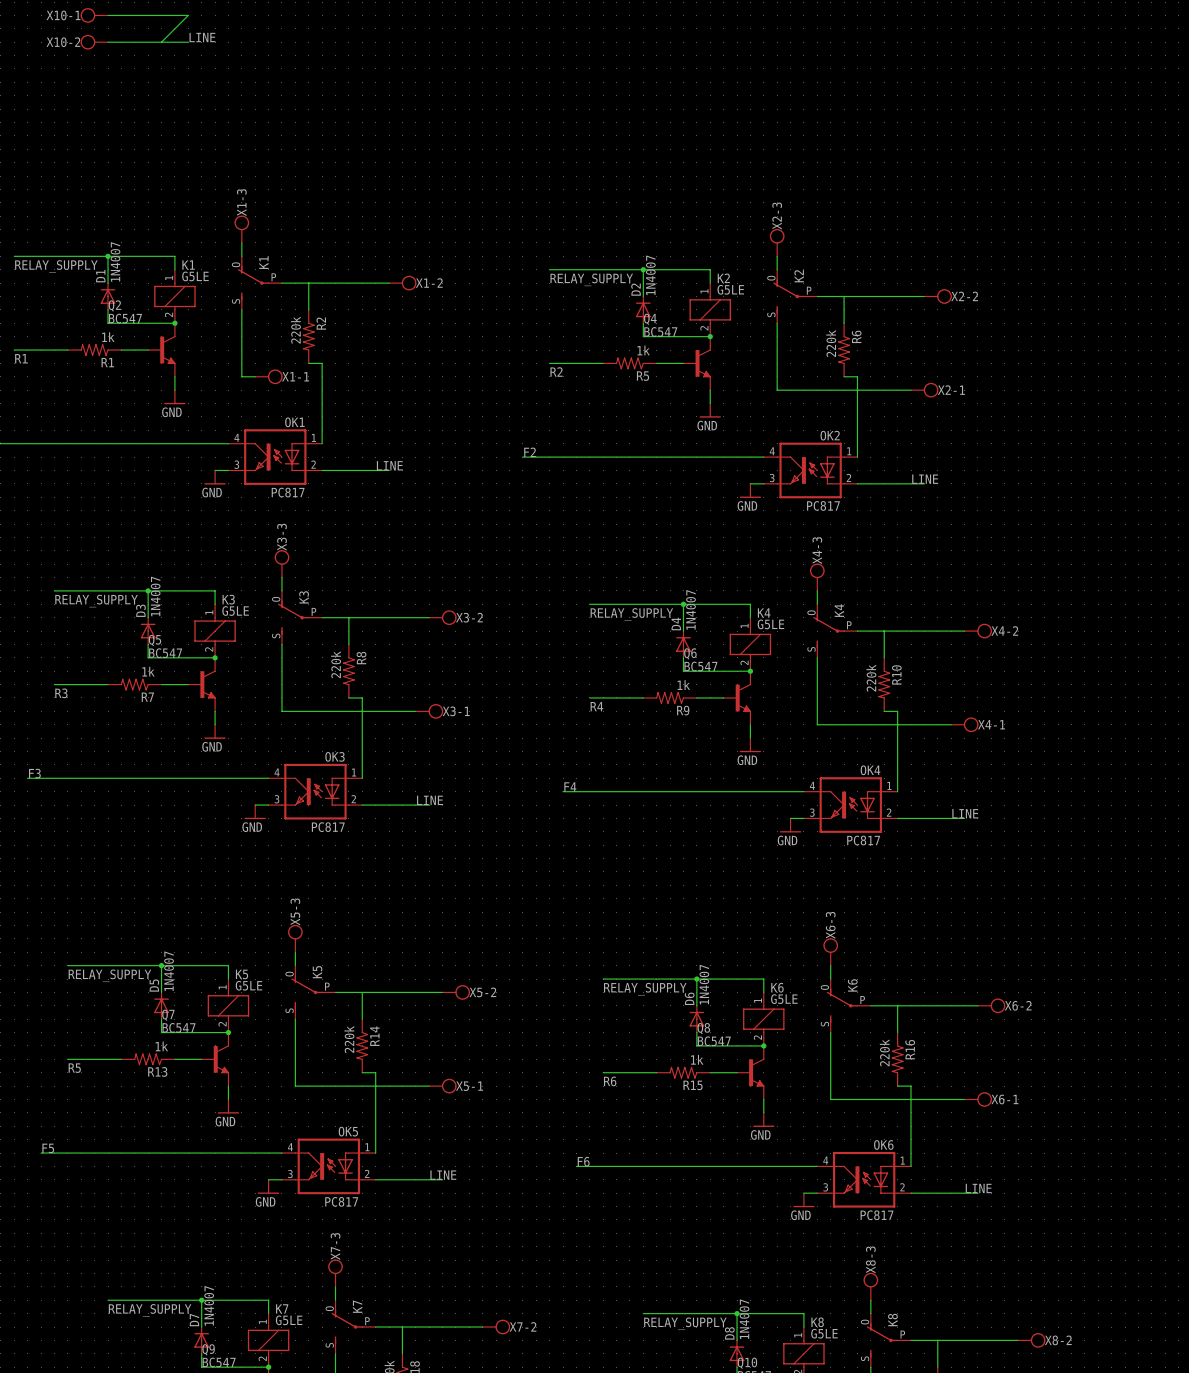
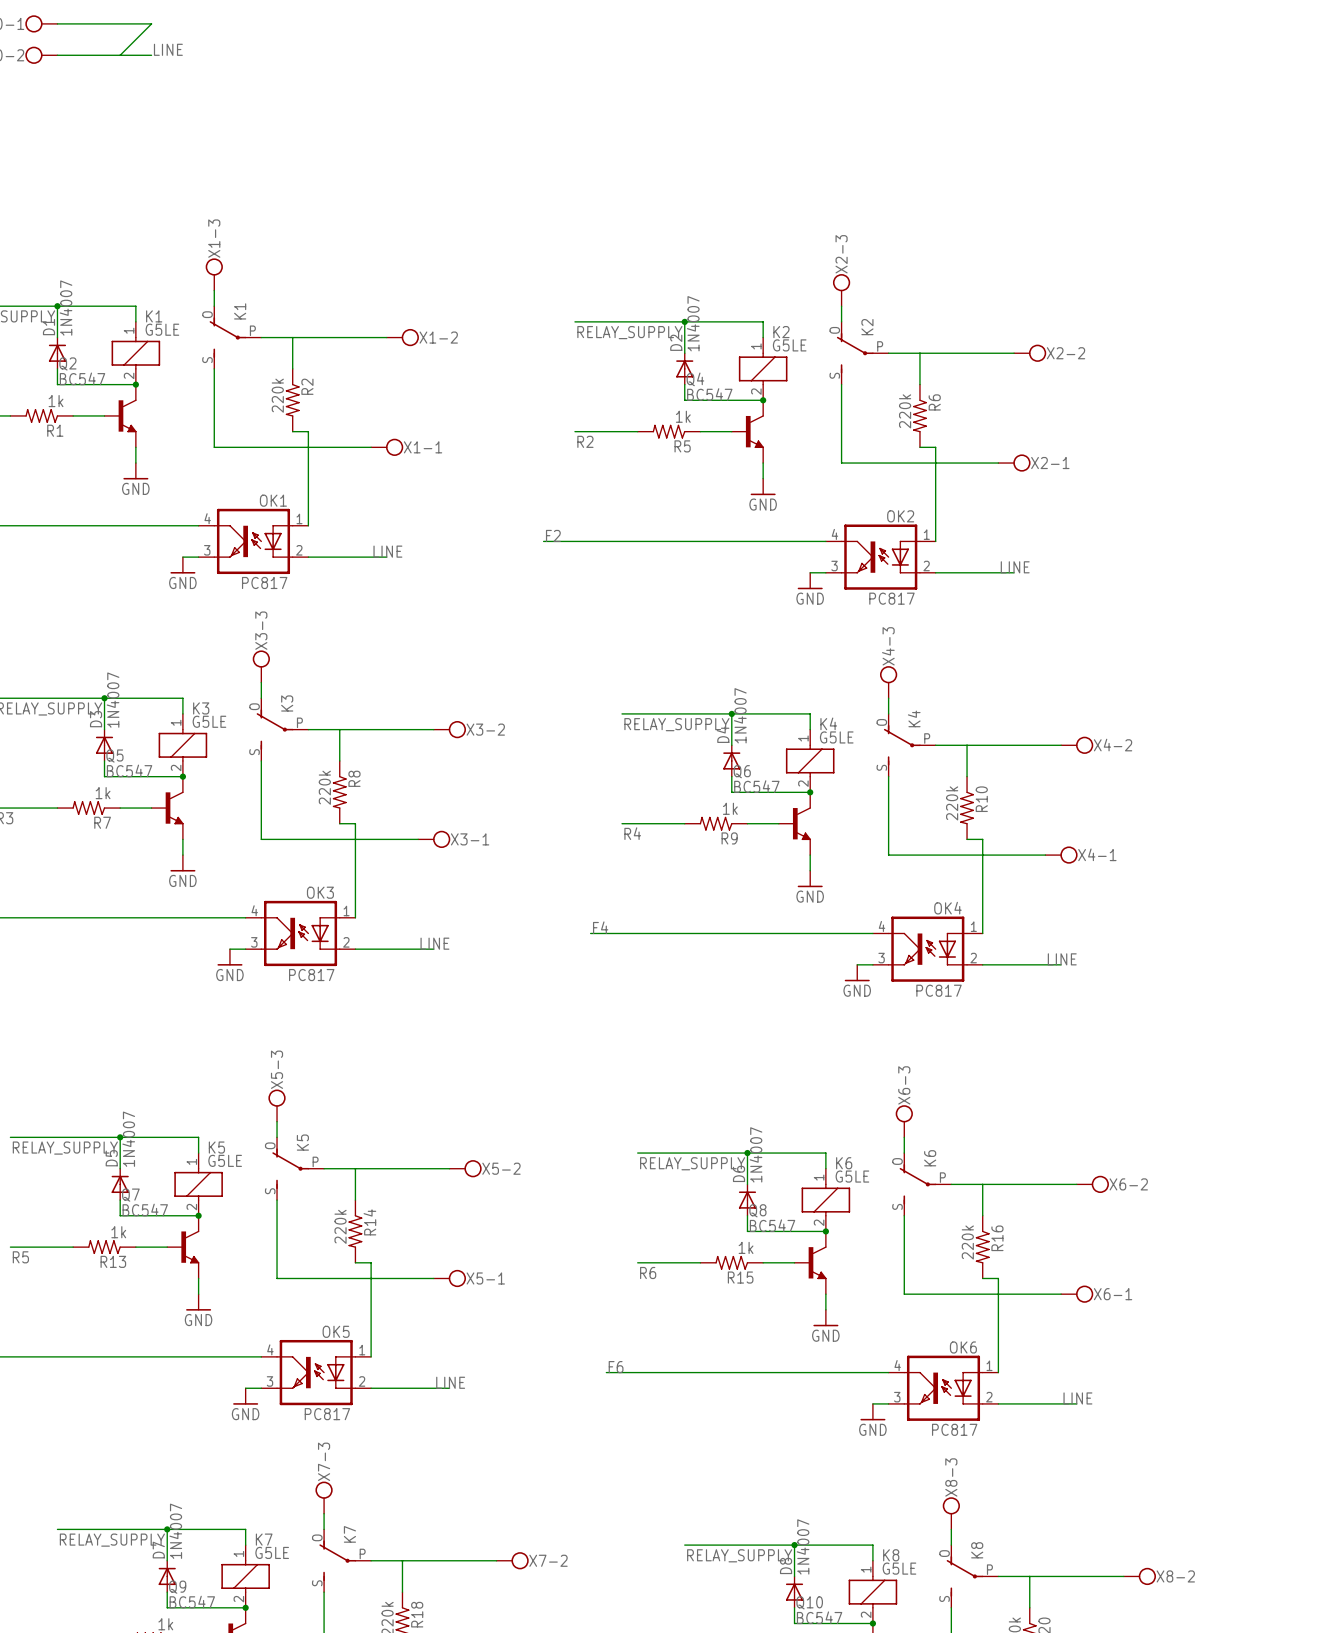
wire: none -> (229, 447) (371, 447)
X1-1 position: (268, 376) -> (387, 447)

